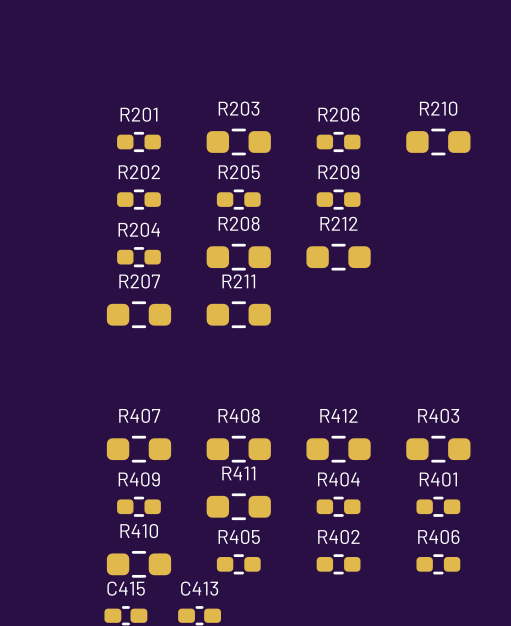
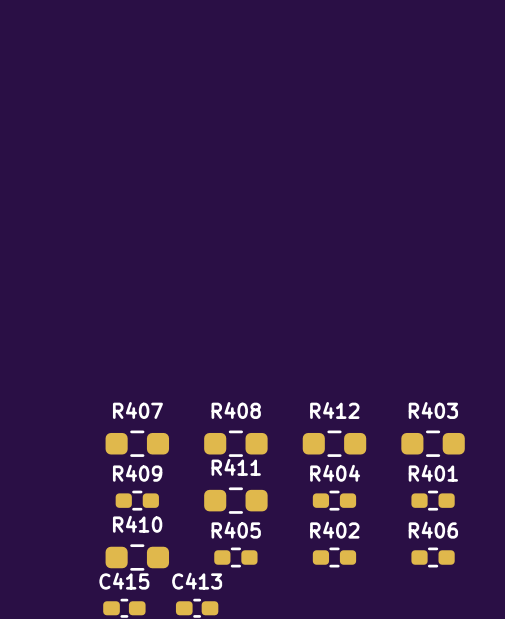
R201: (138, 141) -> none
R203: (238, 141) -> none
R206: (338, 141) -> none
R210: (438, 141) -> none
R202: (138, 199) -> none
R205: (238, 199) -> none
R209: (338, 199) -> none
R204: (138, 257) -> none
R208: (238, 257) -> none
R212: (338, 257) -> none
R207: (138, 314) -> none
R211: (238, 314) -> none

